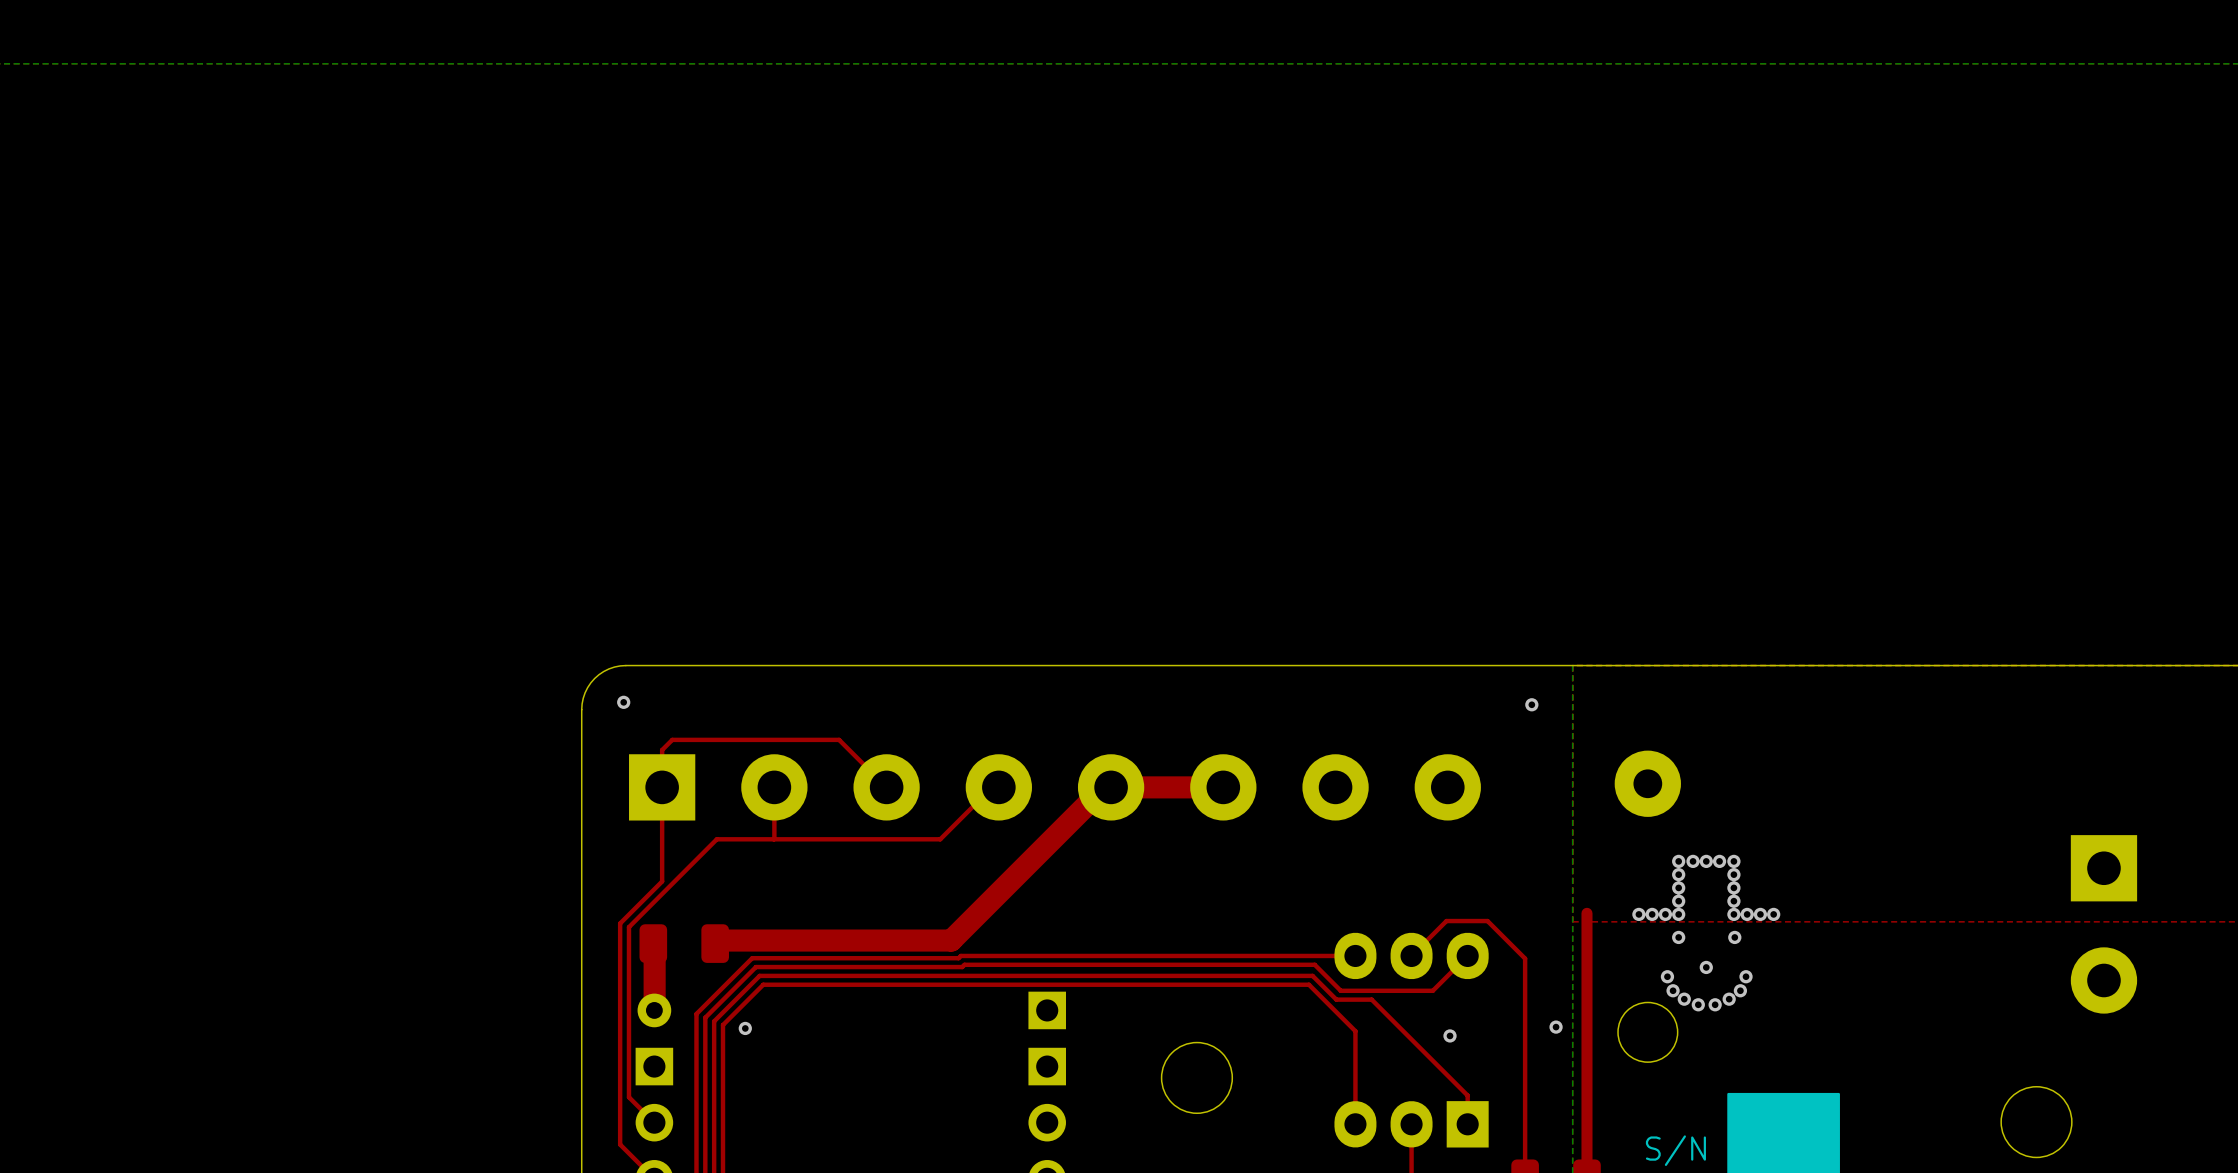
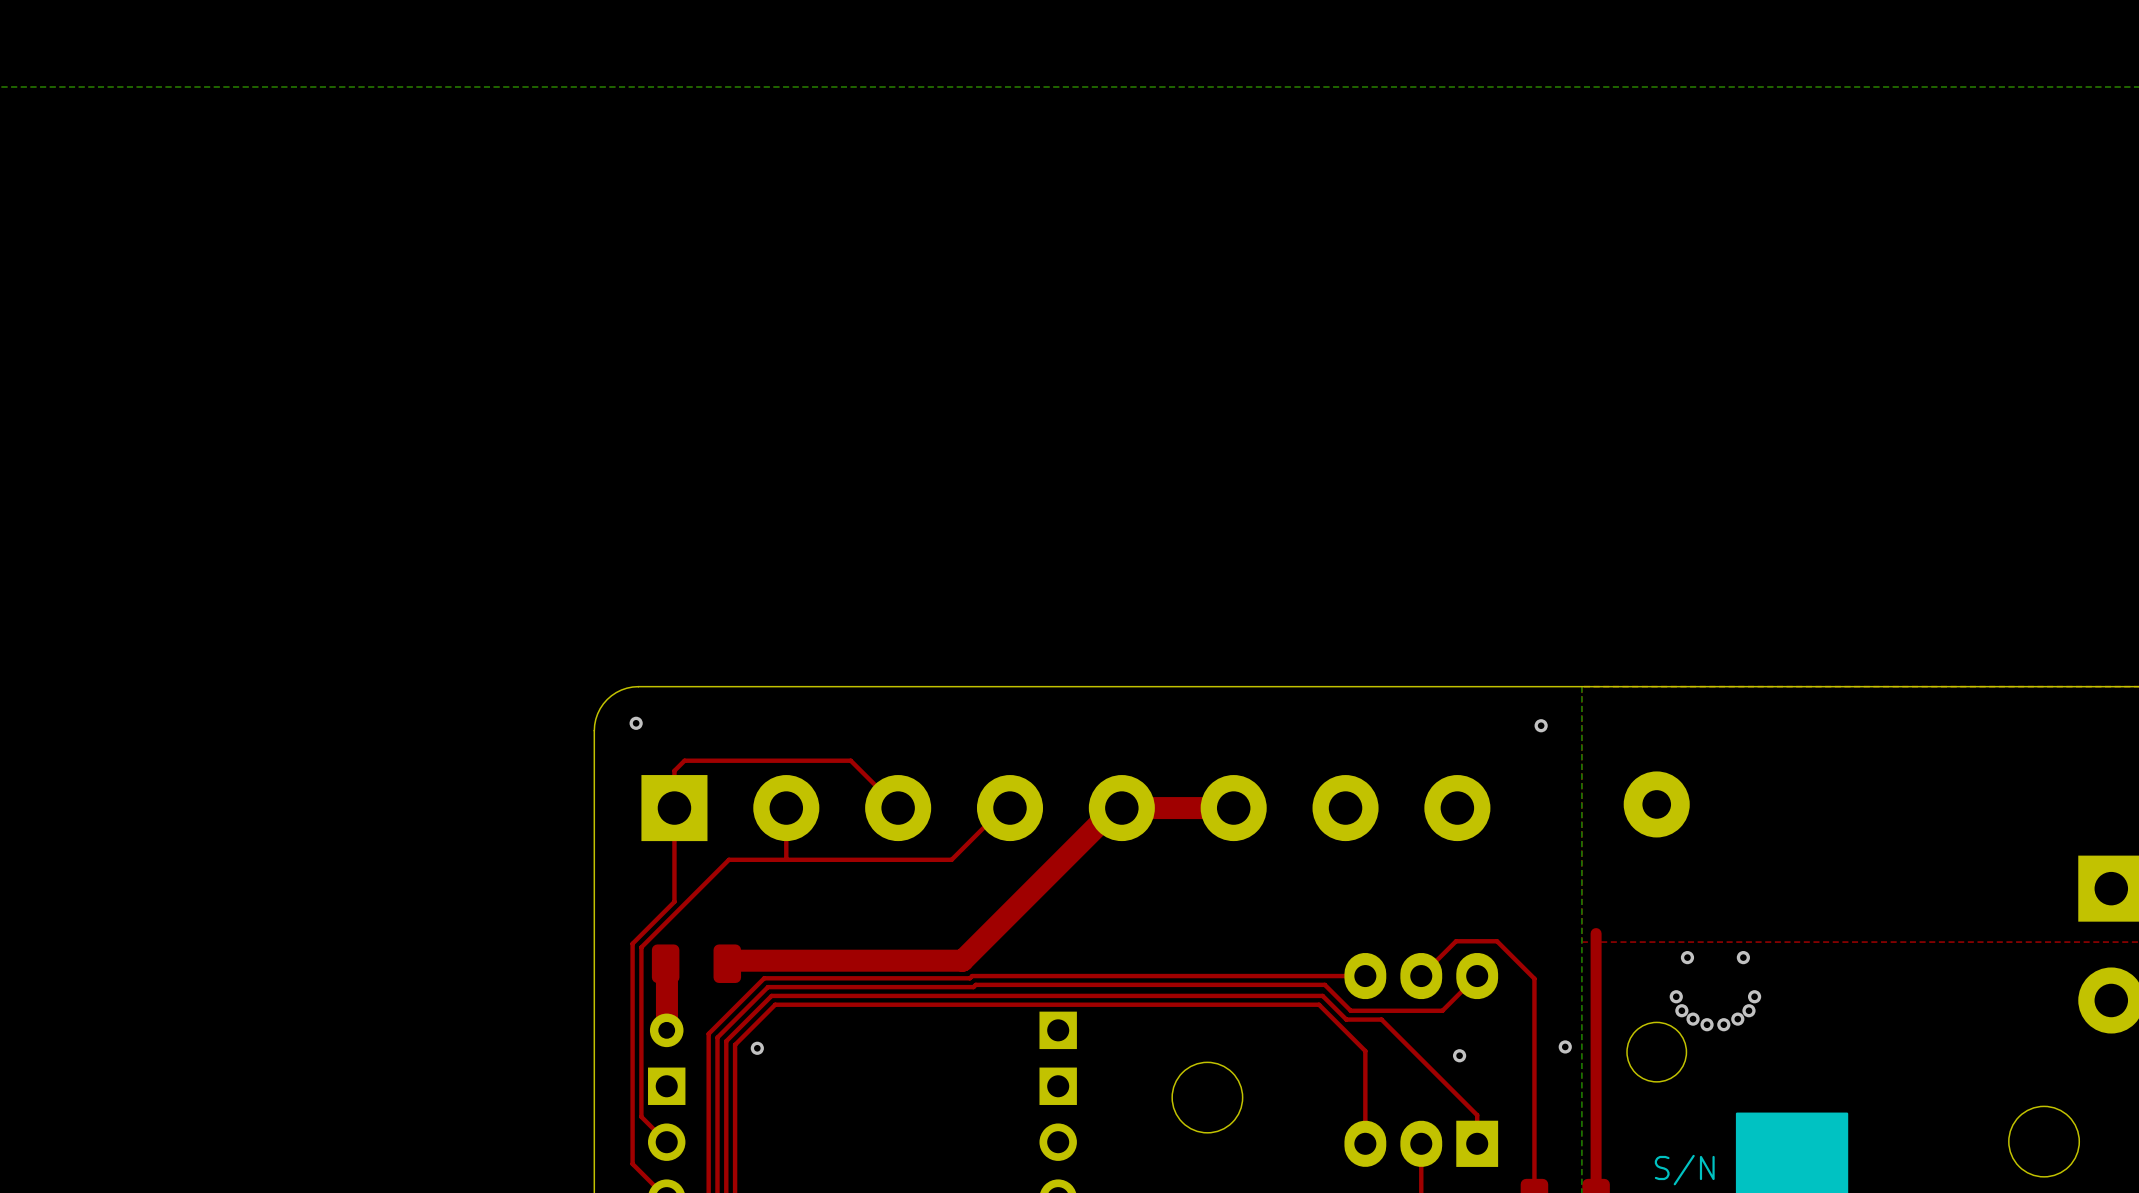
via: (1678, 861) -> none
via: (1693, 861) -> none
via: (1706, 861) -> none
via: (1719, 861) -> none
via: (1733, 861) -> none
via: (1678, 874) -> none
via: (1733, 874) -> none
via: (1678, 887) -> none
via: (1733, 887) -> none
via: (1678, 901) -> none
via: (1733, 901) -> none
via: (1638, 914) -> none
via: (1652, 914) -> none
via: (1665, 914) -> none
via: (1678, 914) -> none
via: (1733, 914) -> none
via: (1747, 914) -> none
via: (1760, 914) -> none
via: (1773, 914) -> none
via: (1706, 967) -> none

